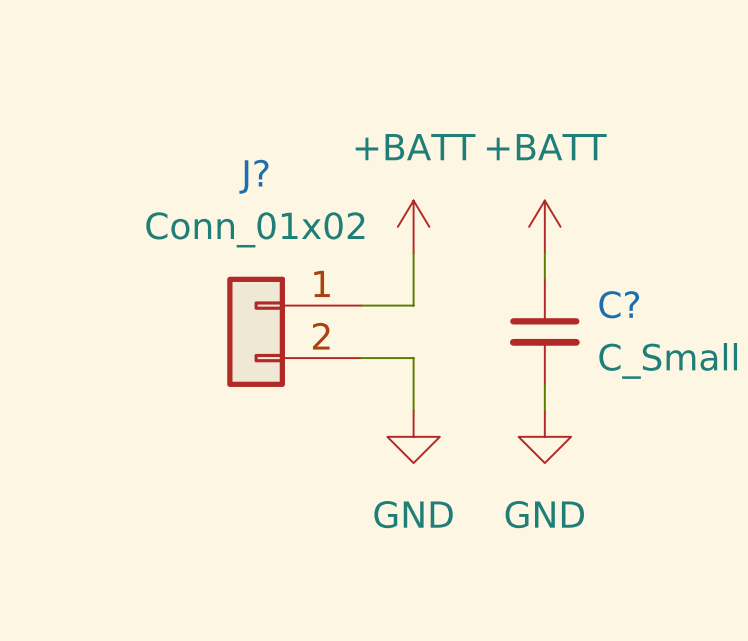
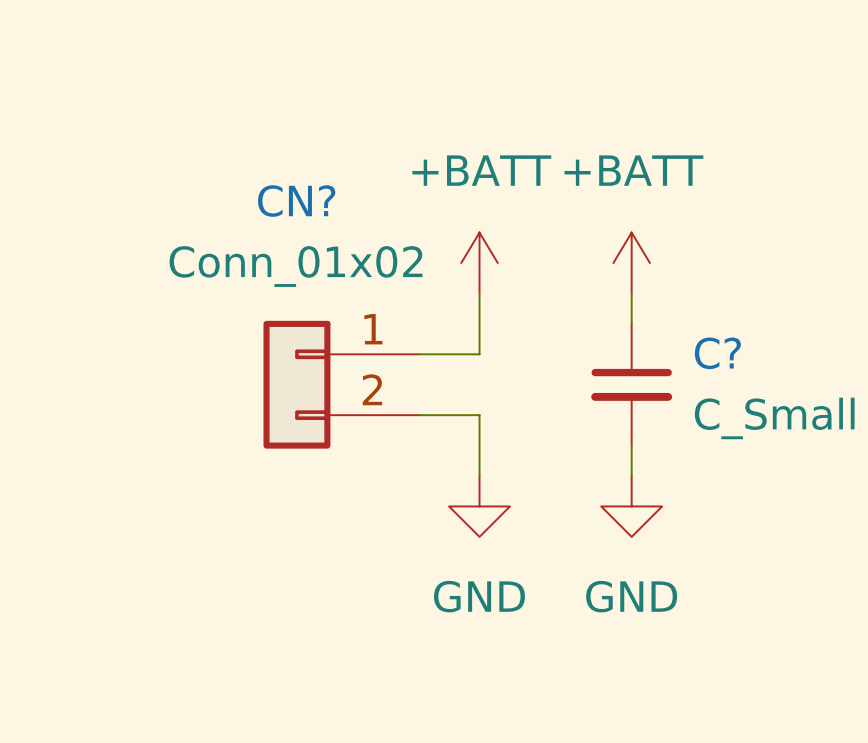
J? name: J? (253, 176) -> CN? (296, 201)

